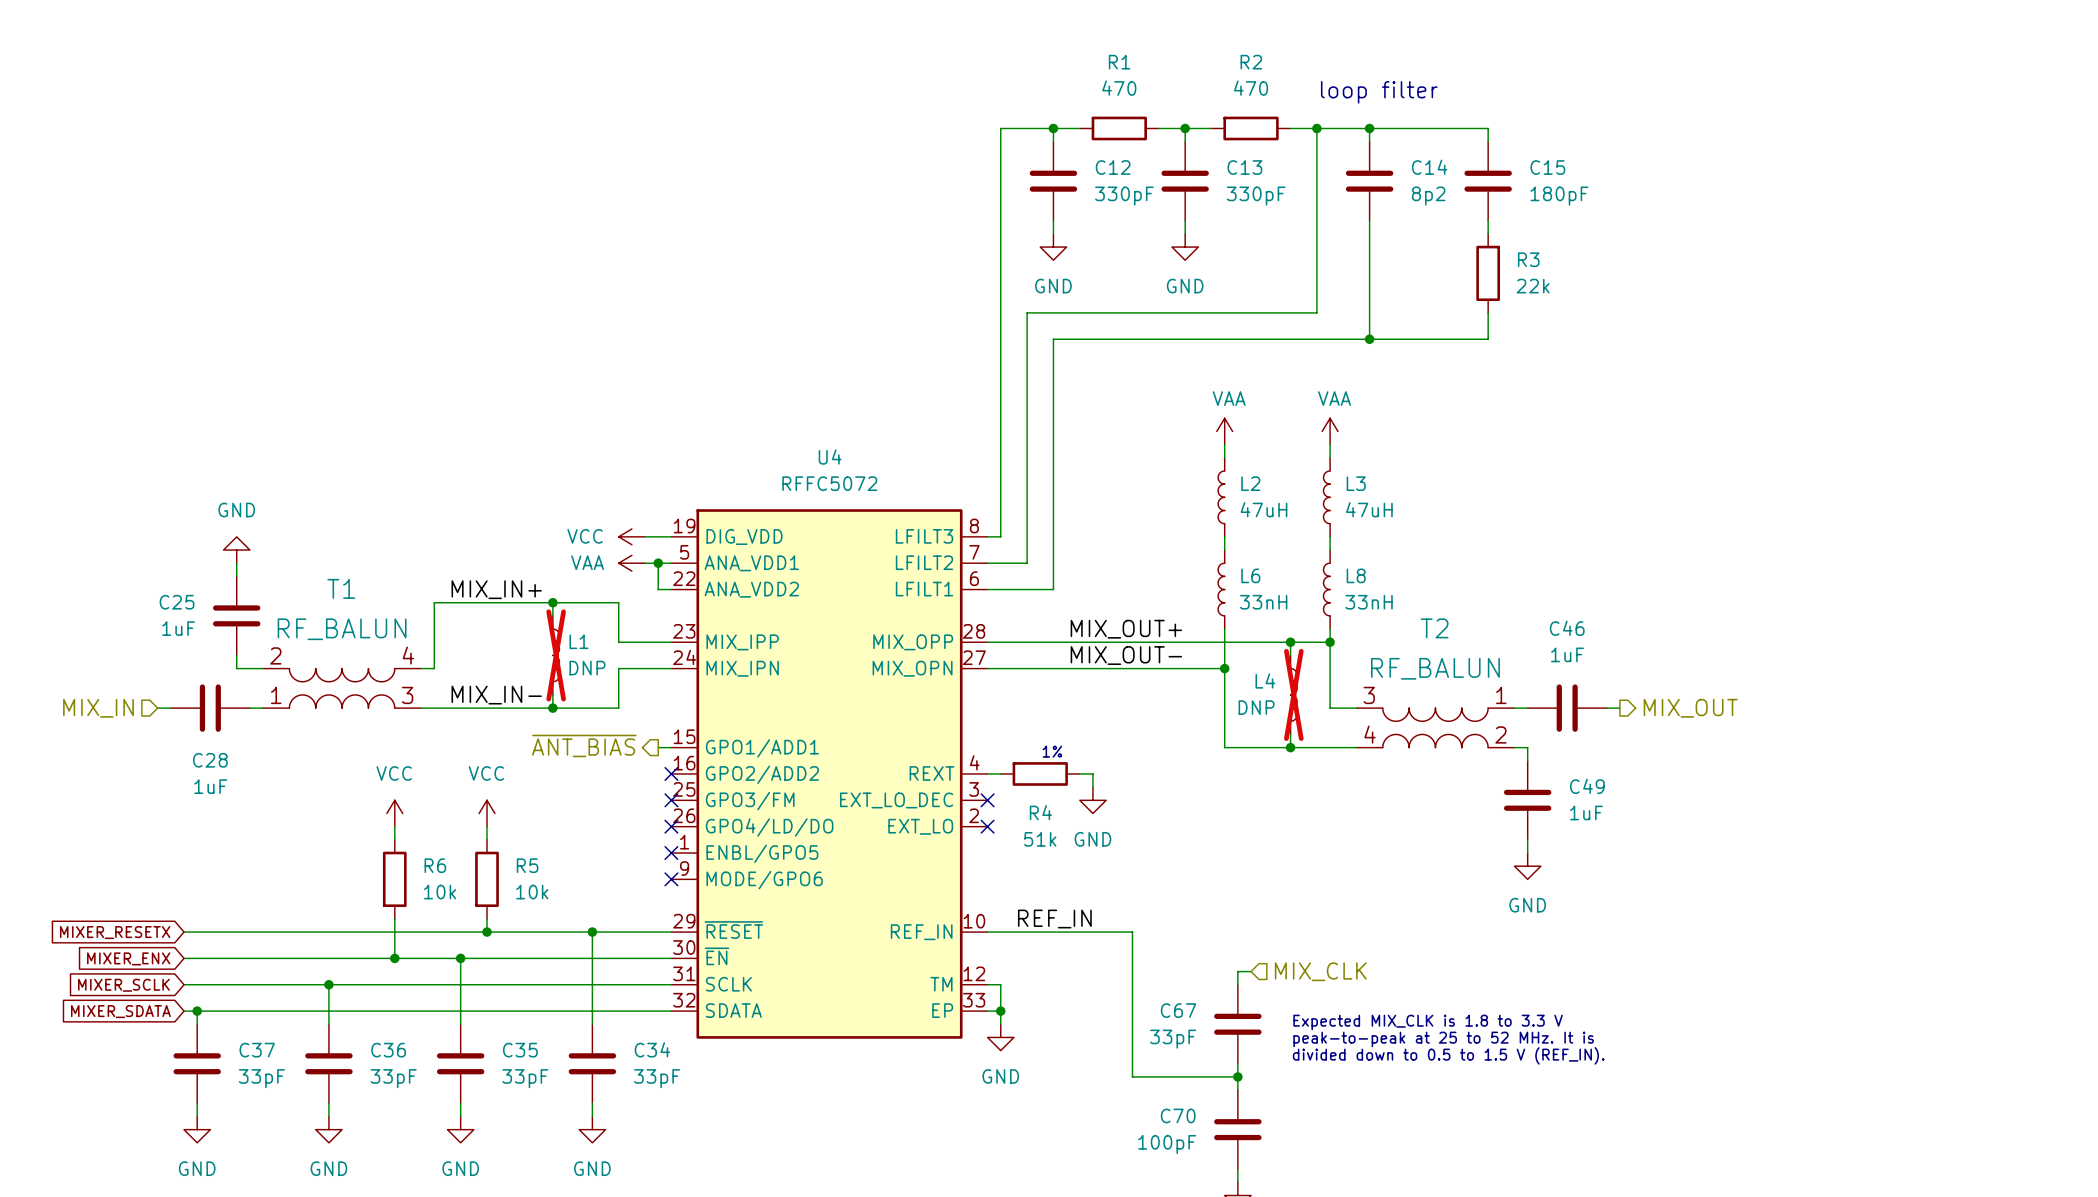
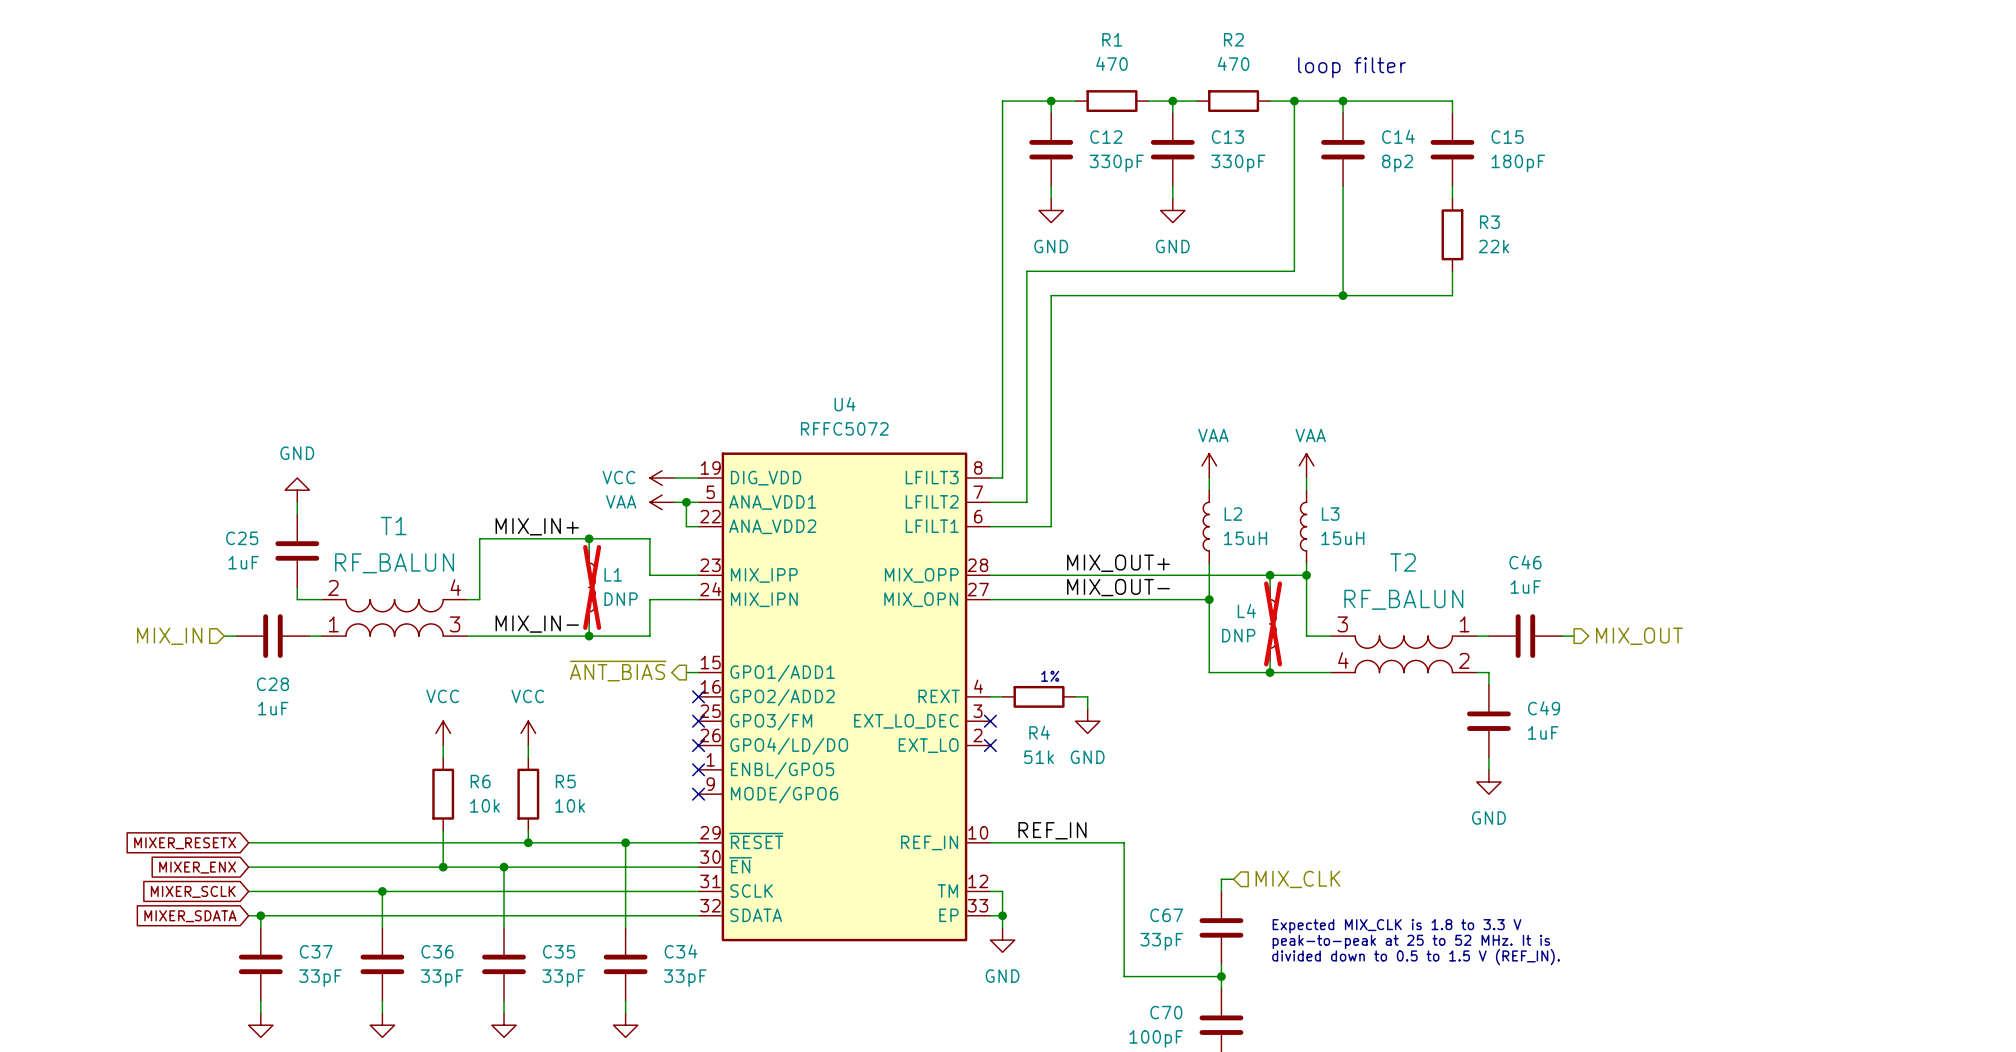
power symbol: VAA (1224, 431) -> none
power symbol: VAA (1330, 431) -> none
wire: (1224, 444) (1224, 457) -> none
wire: (1330, 444) (1330, 457) -> none
L2: 47uH (1221, 497) -> none
L3: 47uH (1326, 497) -> none
power symbol: none -> VAA (1209, 465)
power symbol: none -> VAA (1306, 465)
L6 name: L6 (1250, 575) -> L2 (1233, 514)
L8 name: L8 (1356, 575) -> L3 (1330, 514)
L6 value: 33nH (1263, 602) -> 15uH (1245, 538)
L8 value: 33nH (1369, 602) -> 15uH (1342, 538)

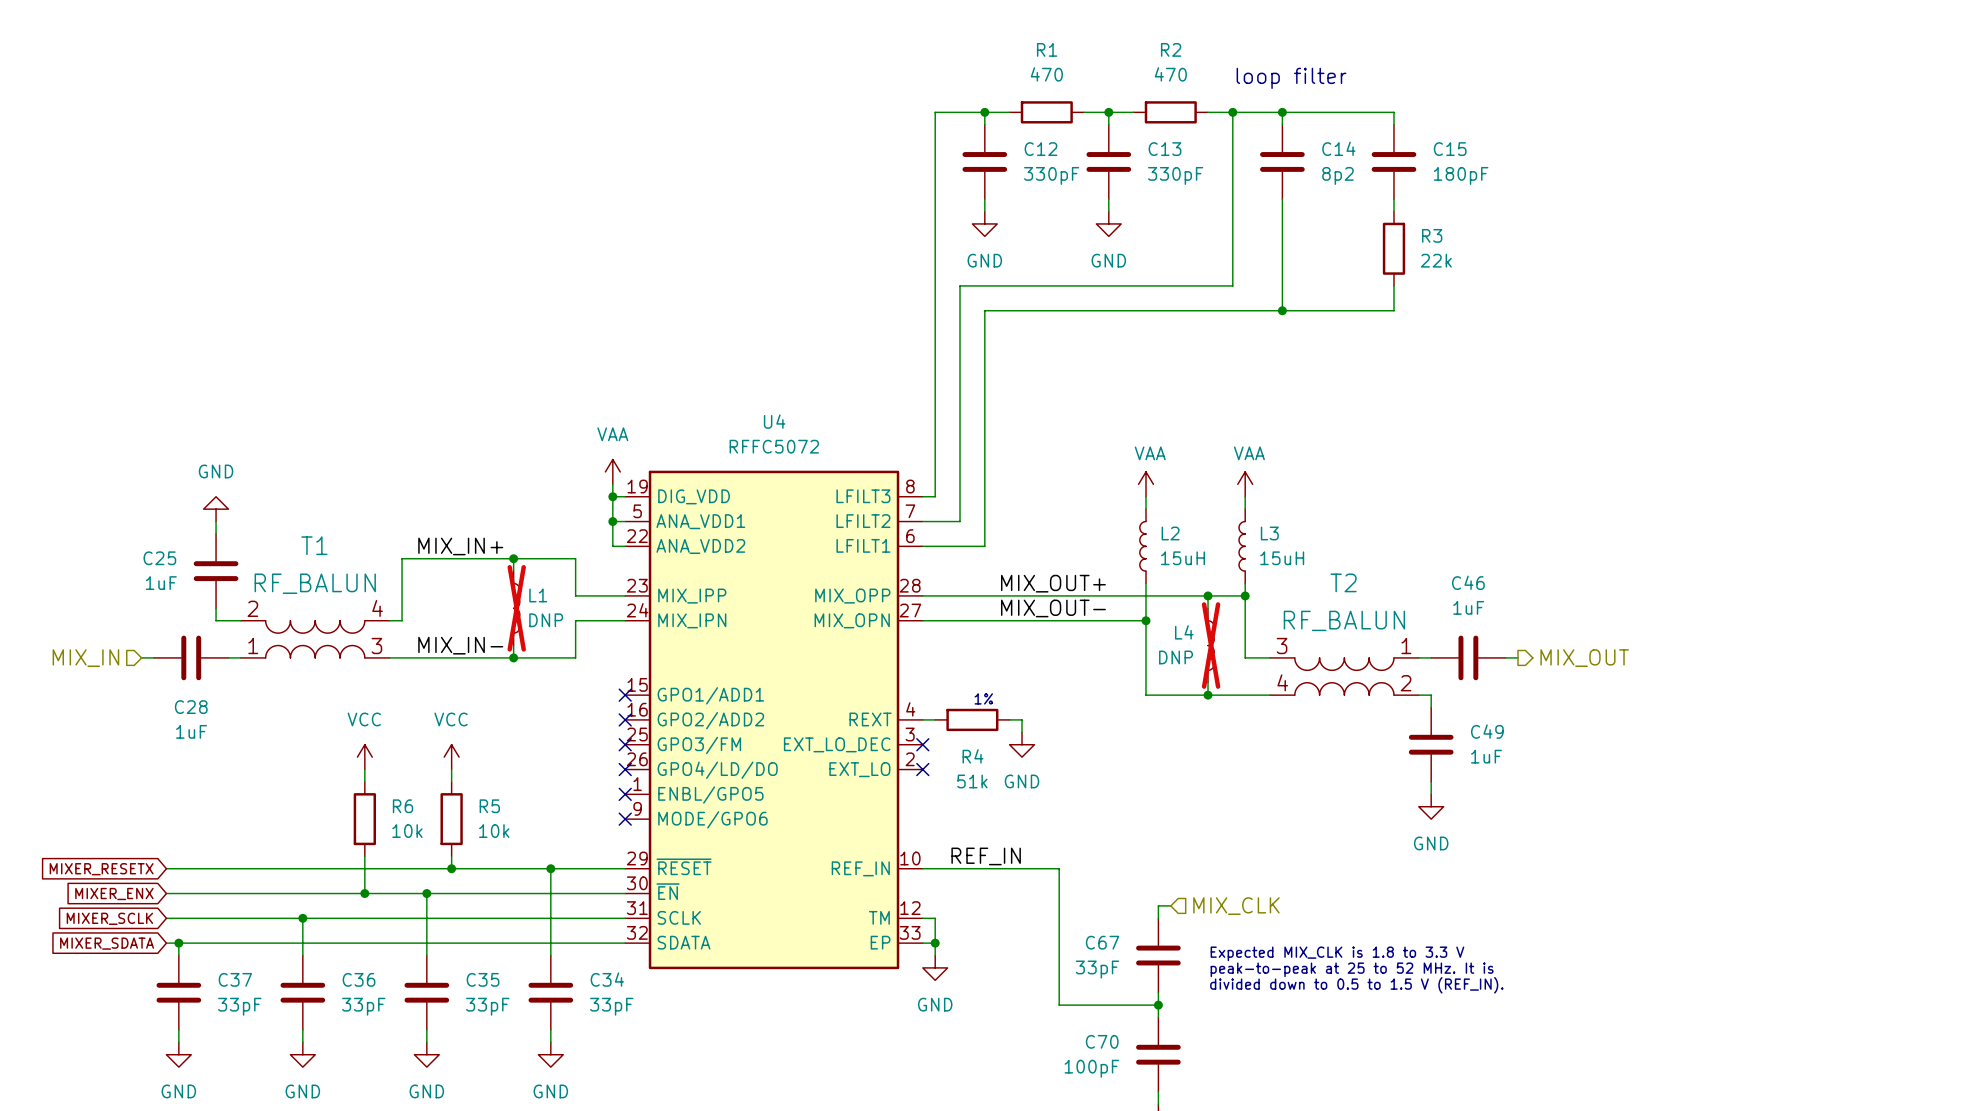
power symbol: VCC (662, 478) -> none
wire: (674, 478) (686, 478) -> none
junction: none -> (612, 496)
power symbol rotation: 0° (662, 502) -> 90° clockwise (612, 471)
power symbol position: VAA (662, 502) -> VAA (612, 471)
wire: (674, 502) (686, 502) -> (612, 484) (612, 521)
hierarchical label: ~{ANT_BIAS} (618, 671) -> none
wire: (686, 672) (698, 672) -> none
no-connect mark: none -> (625, 695)

